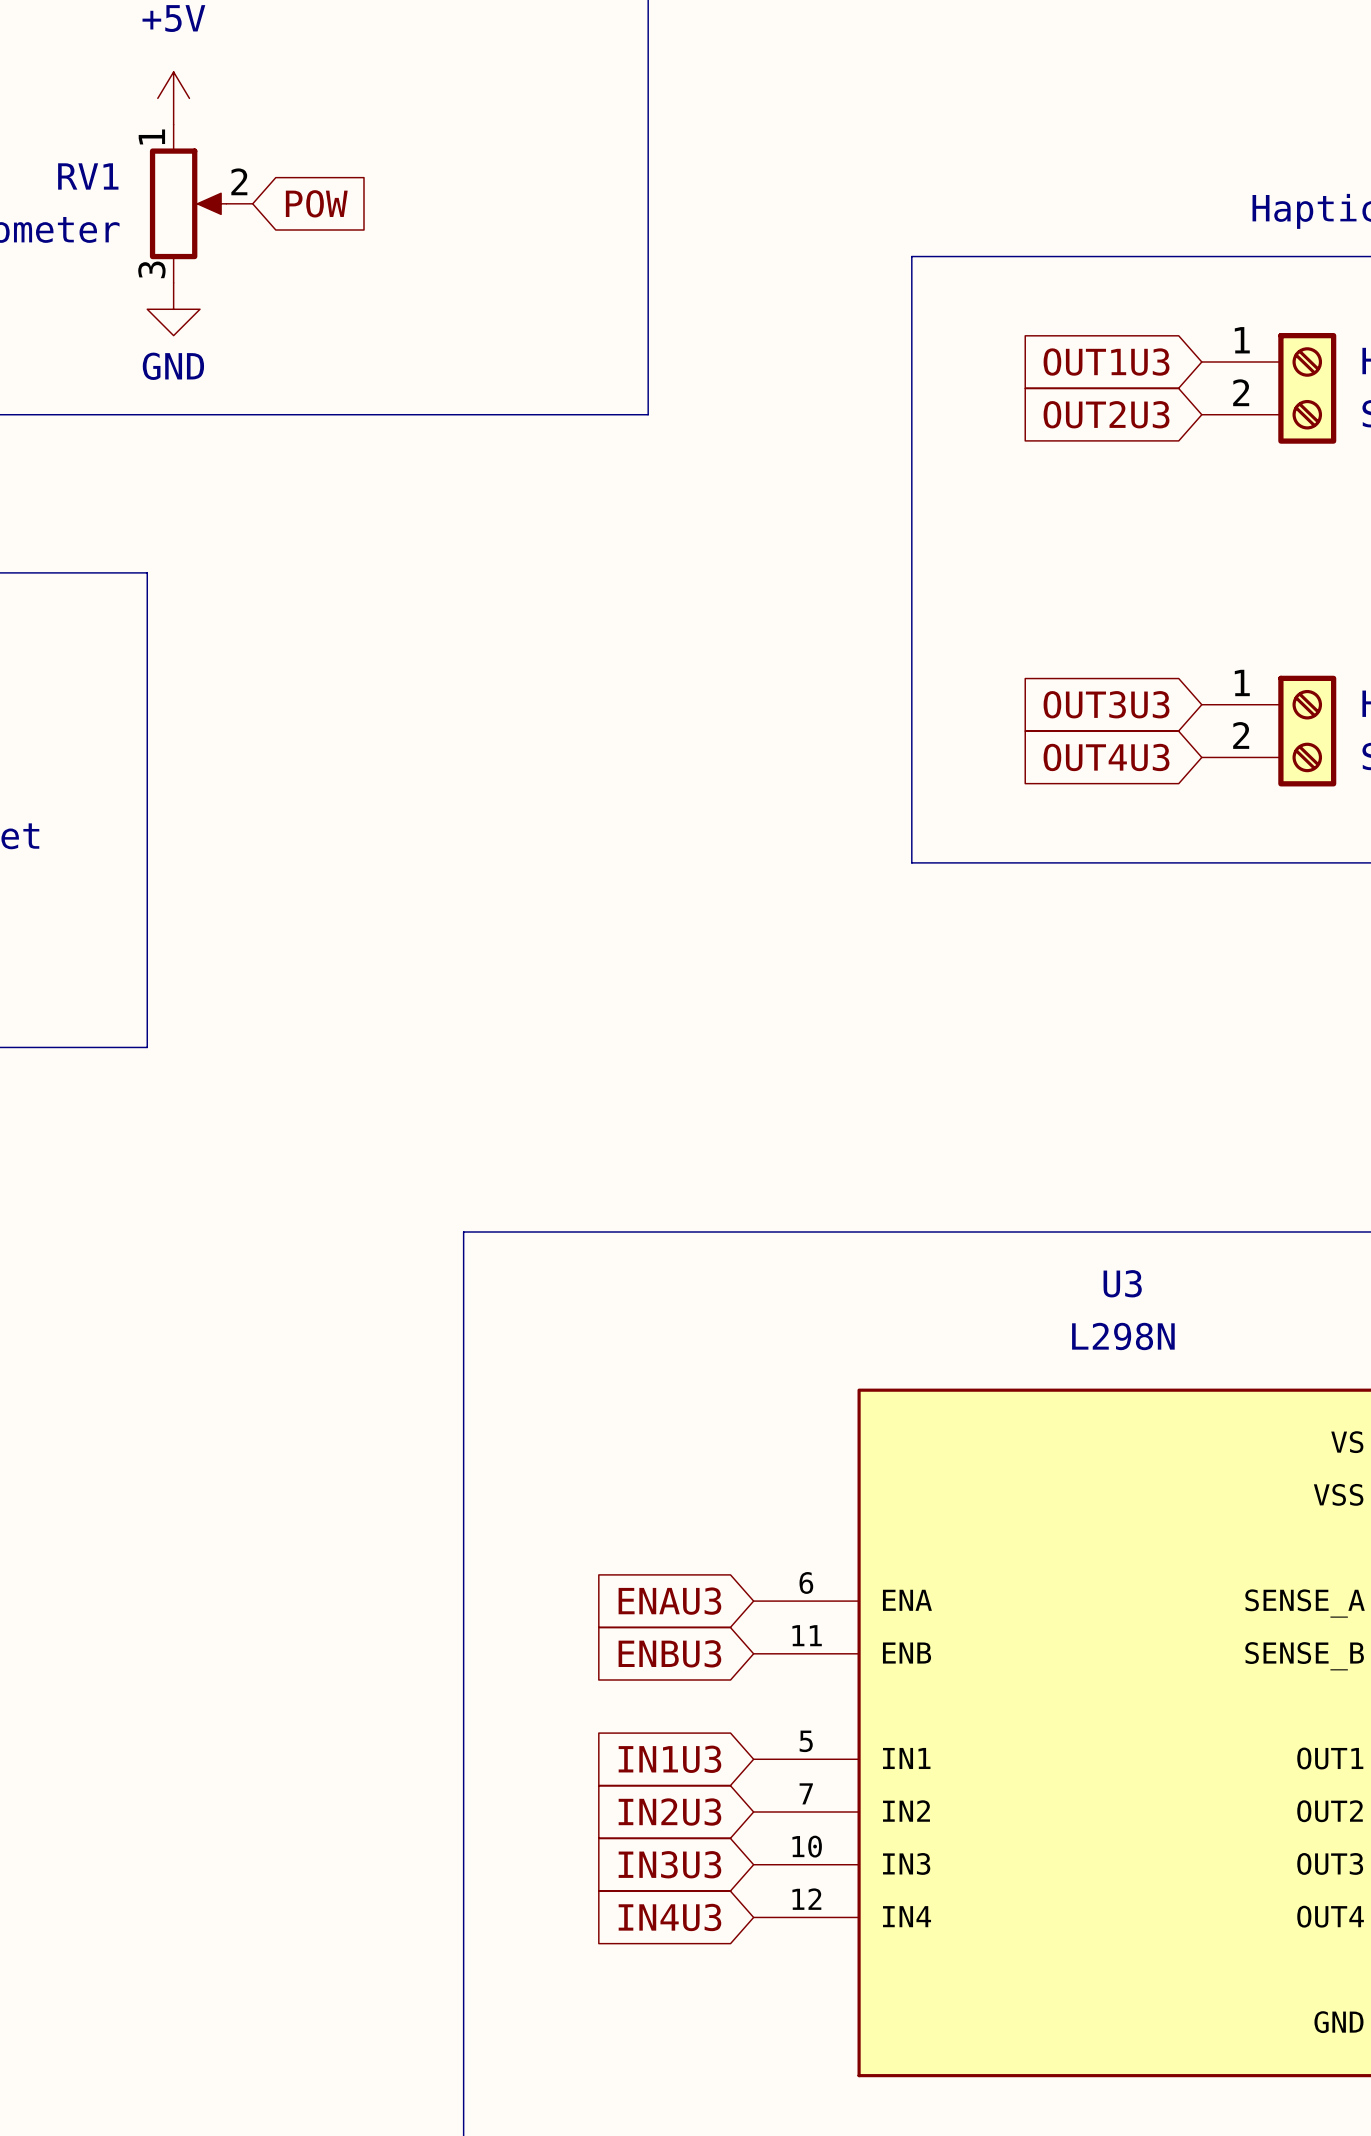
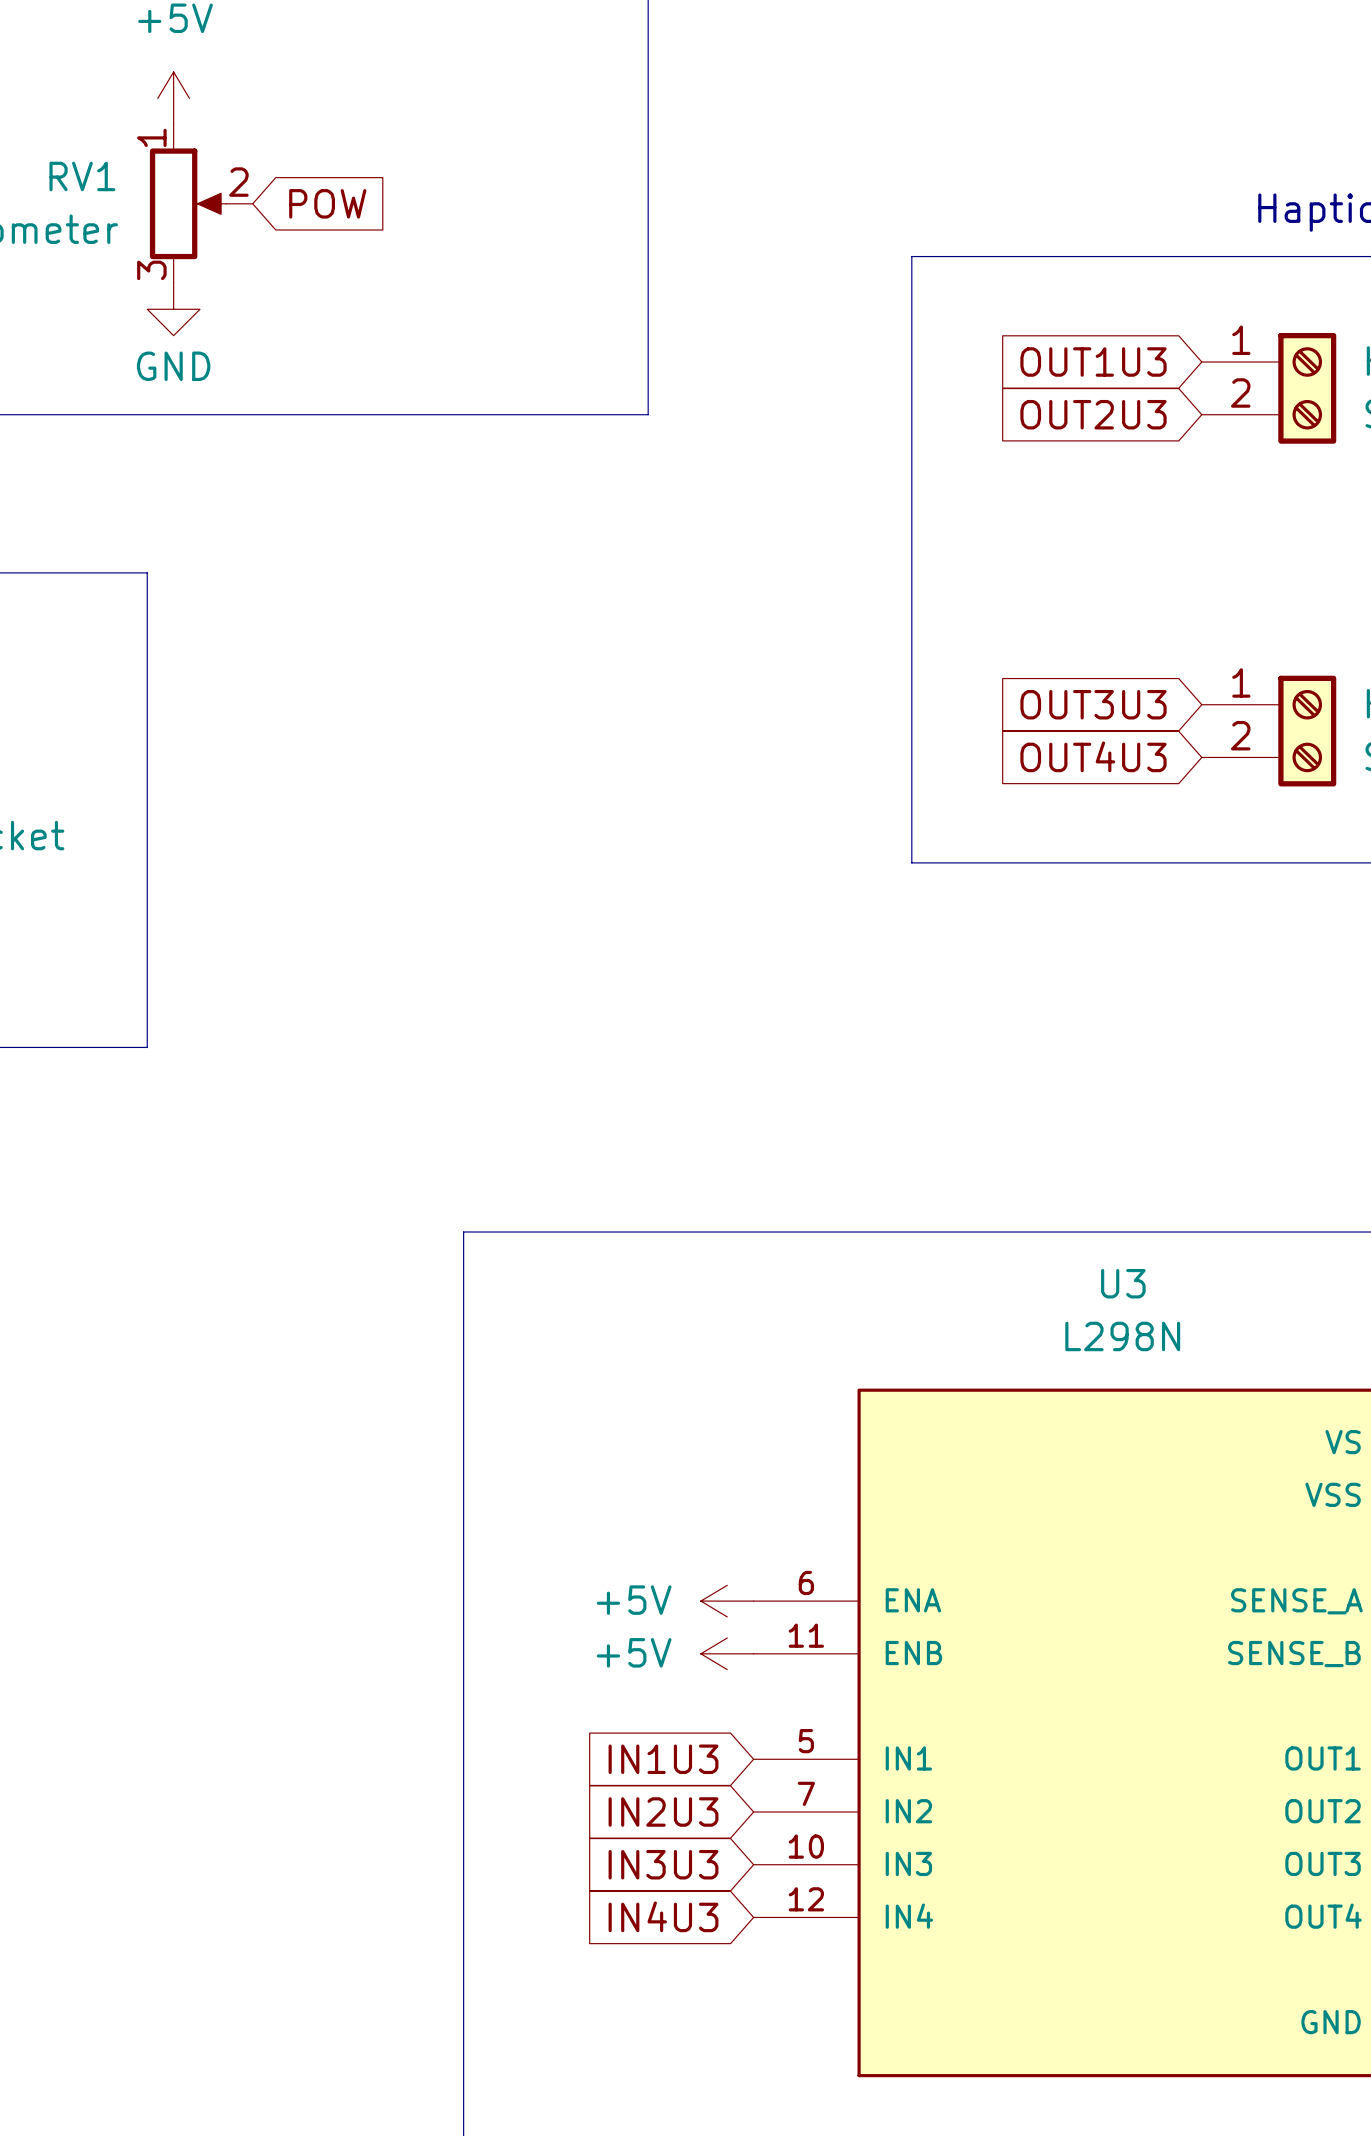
global label: ENAU3 (669, 1601) -> none
power symbol: none -> +5V (727, 1601)
global label: ENBU3 (669, 1653) -> none
power symbol: none -> +5V (727, 1653)

